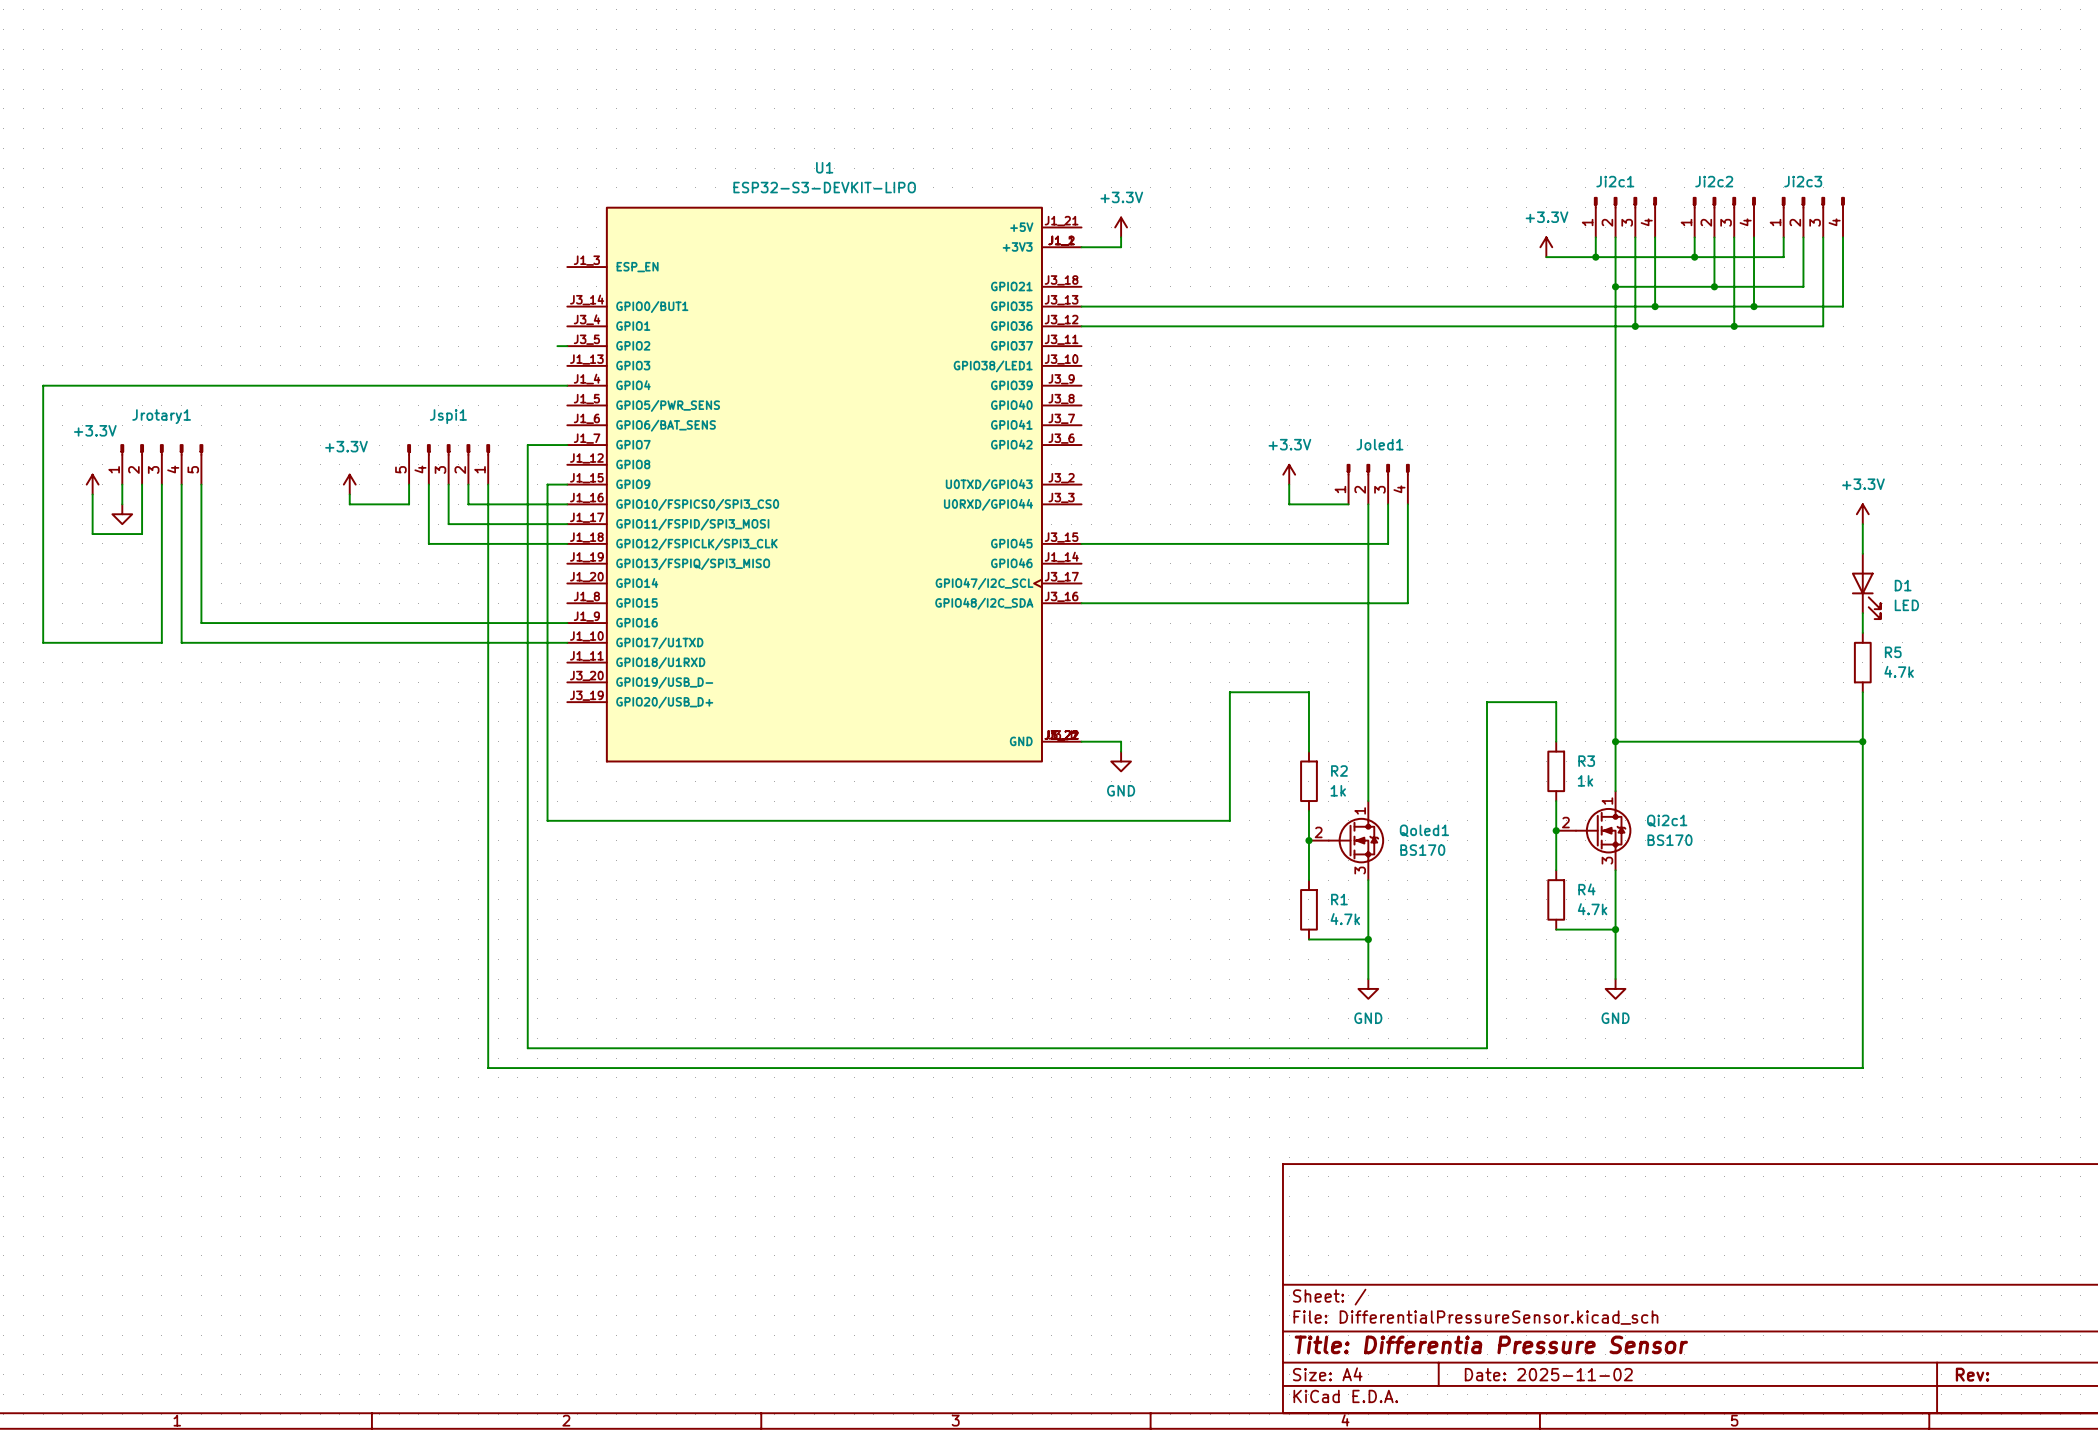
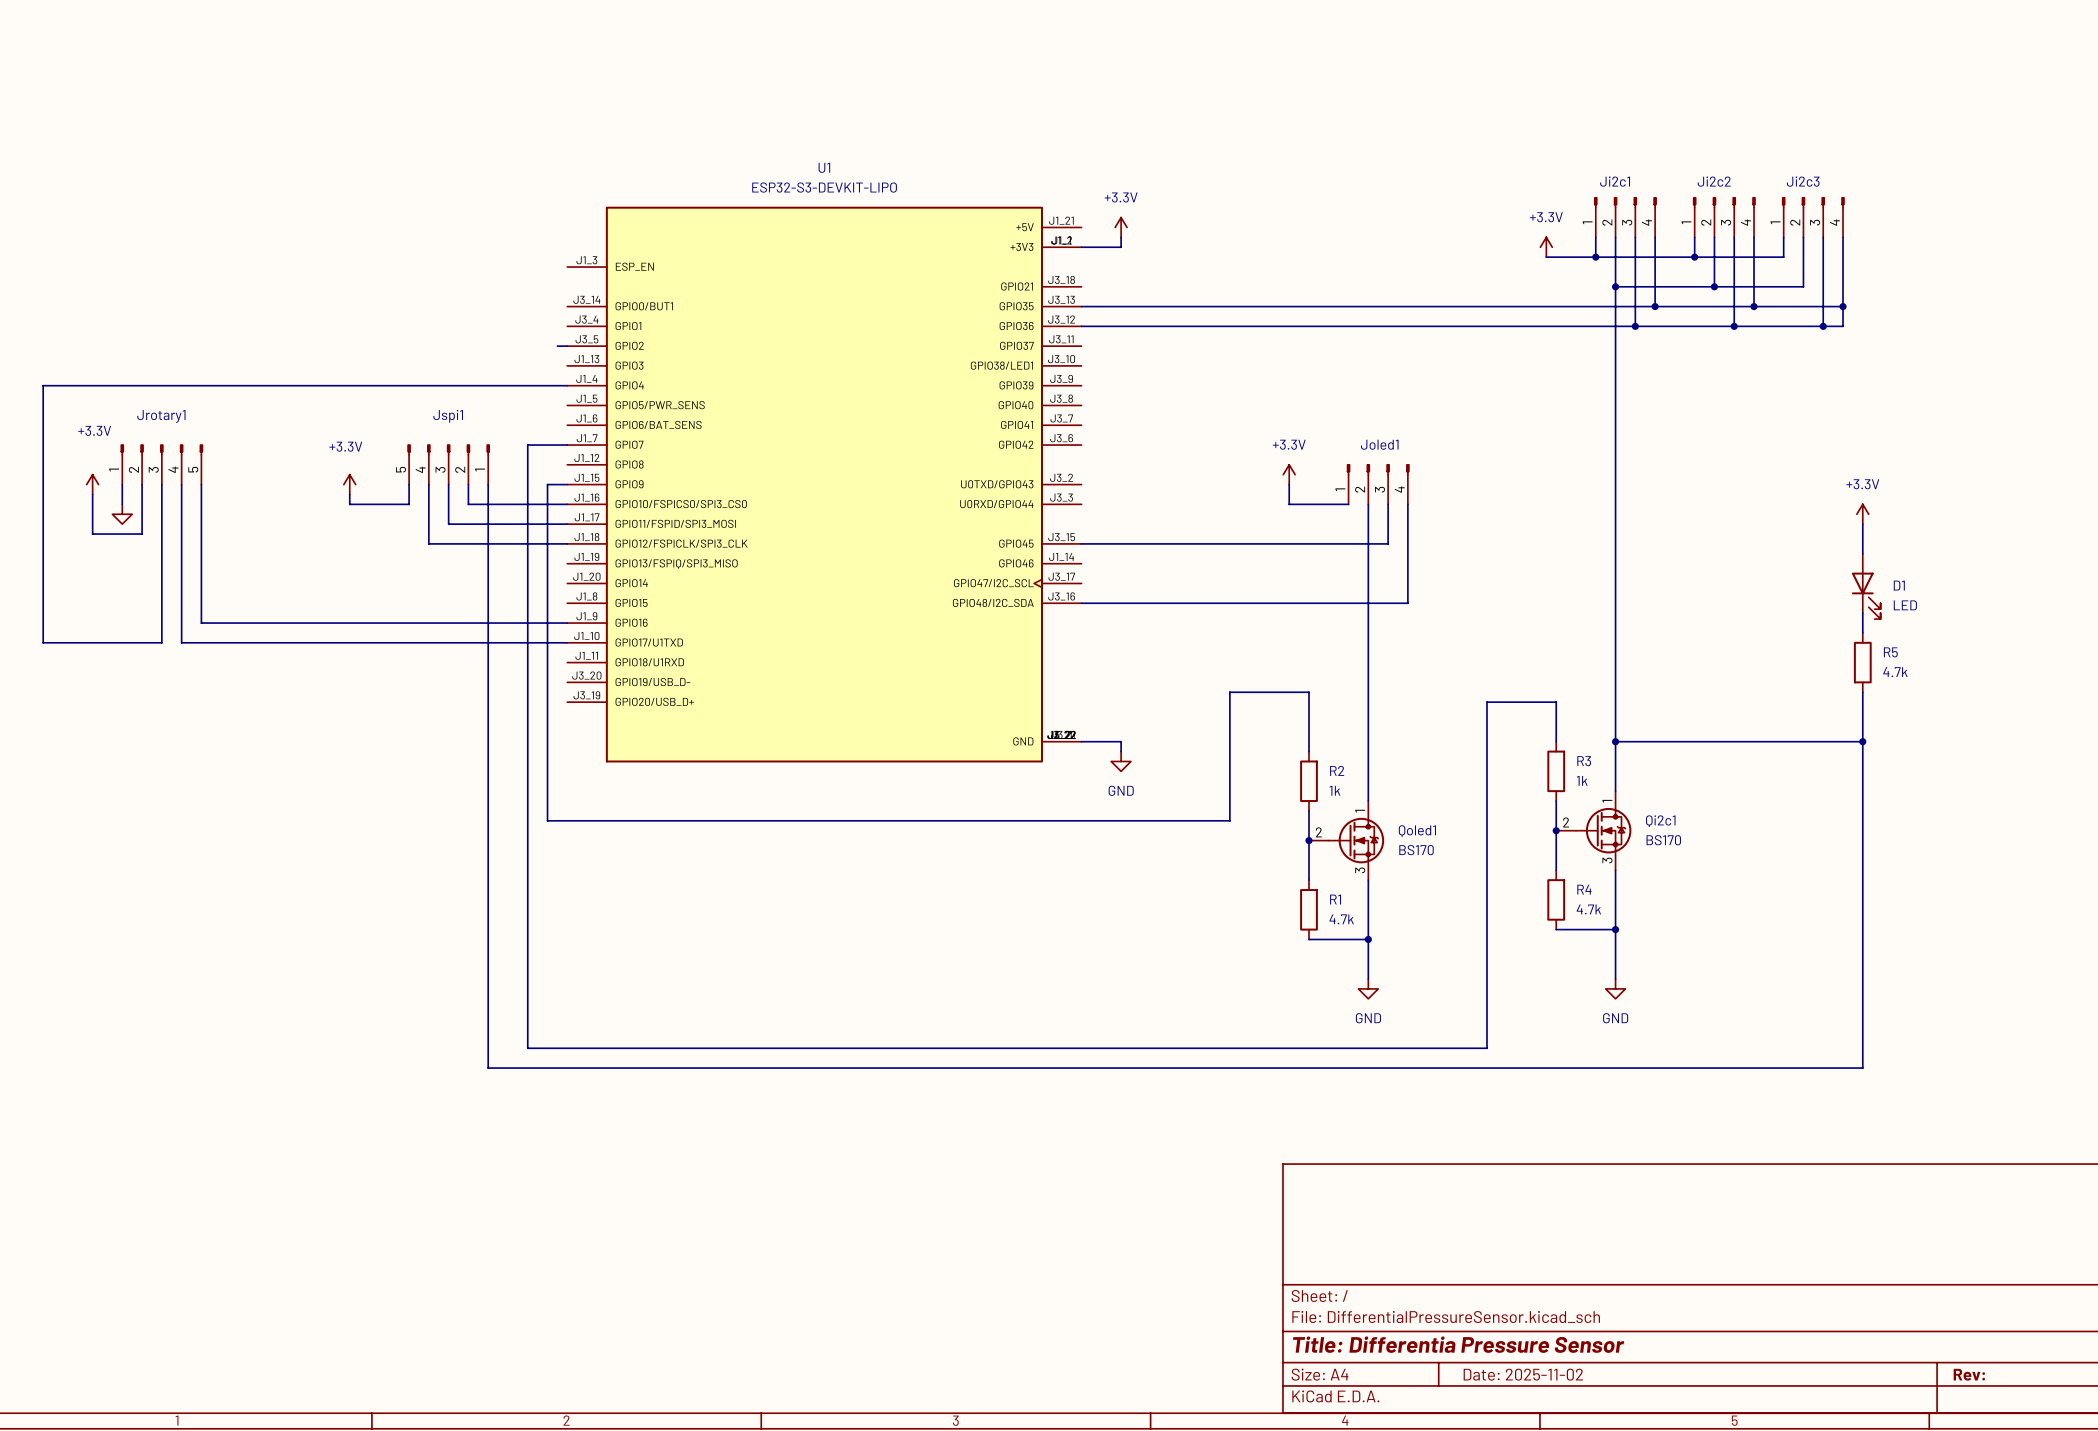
wire: none -> (1843, 306) (1843, 326) (1823, 326)
junction: none -> (1843, 306)
junction: none -> (1823, 326)

